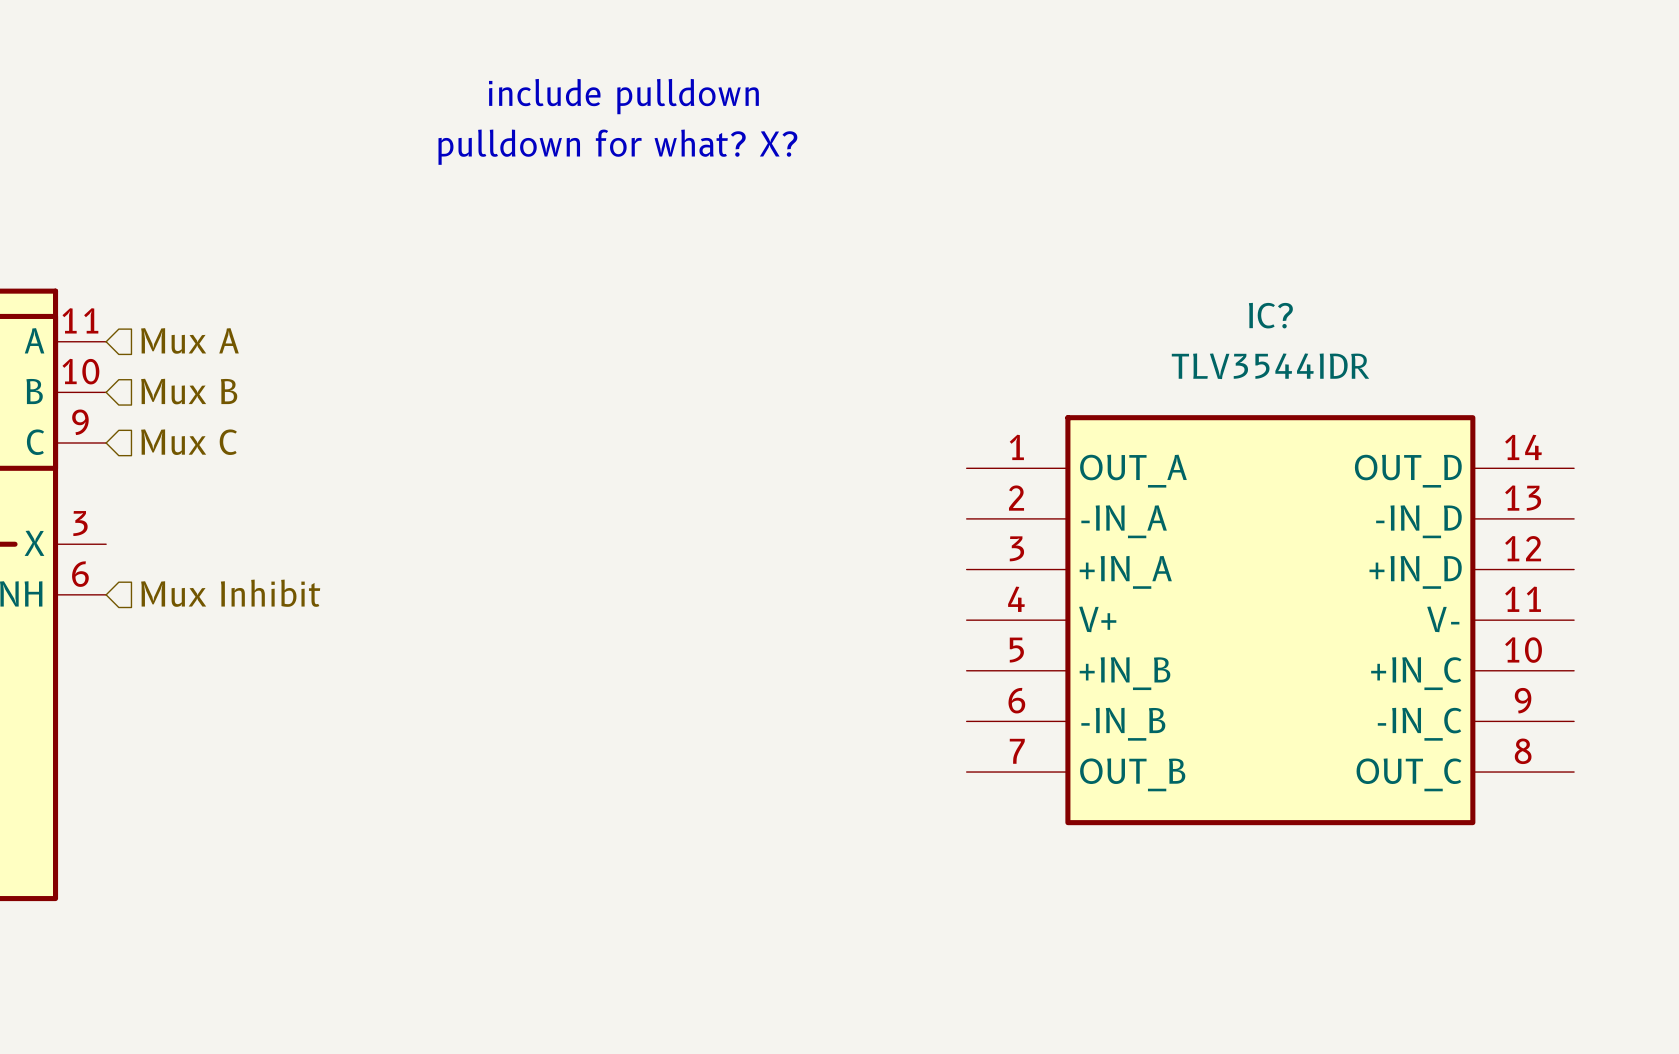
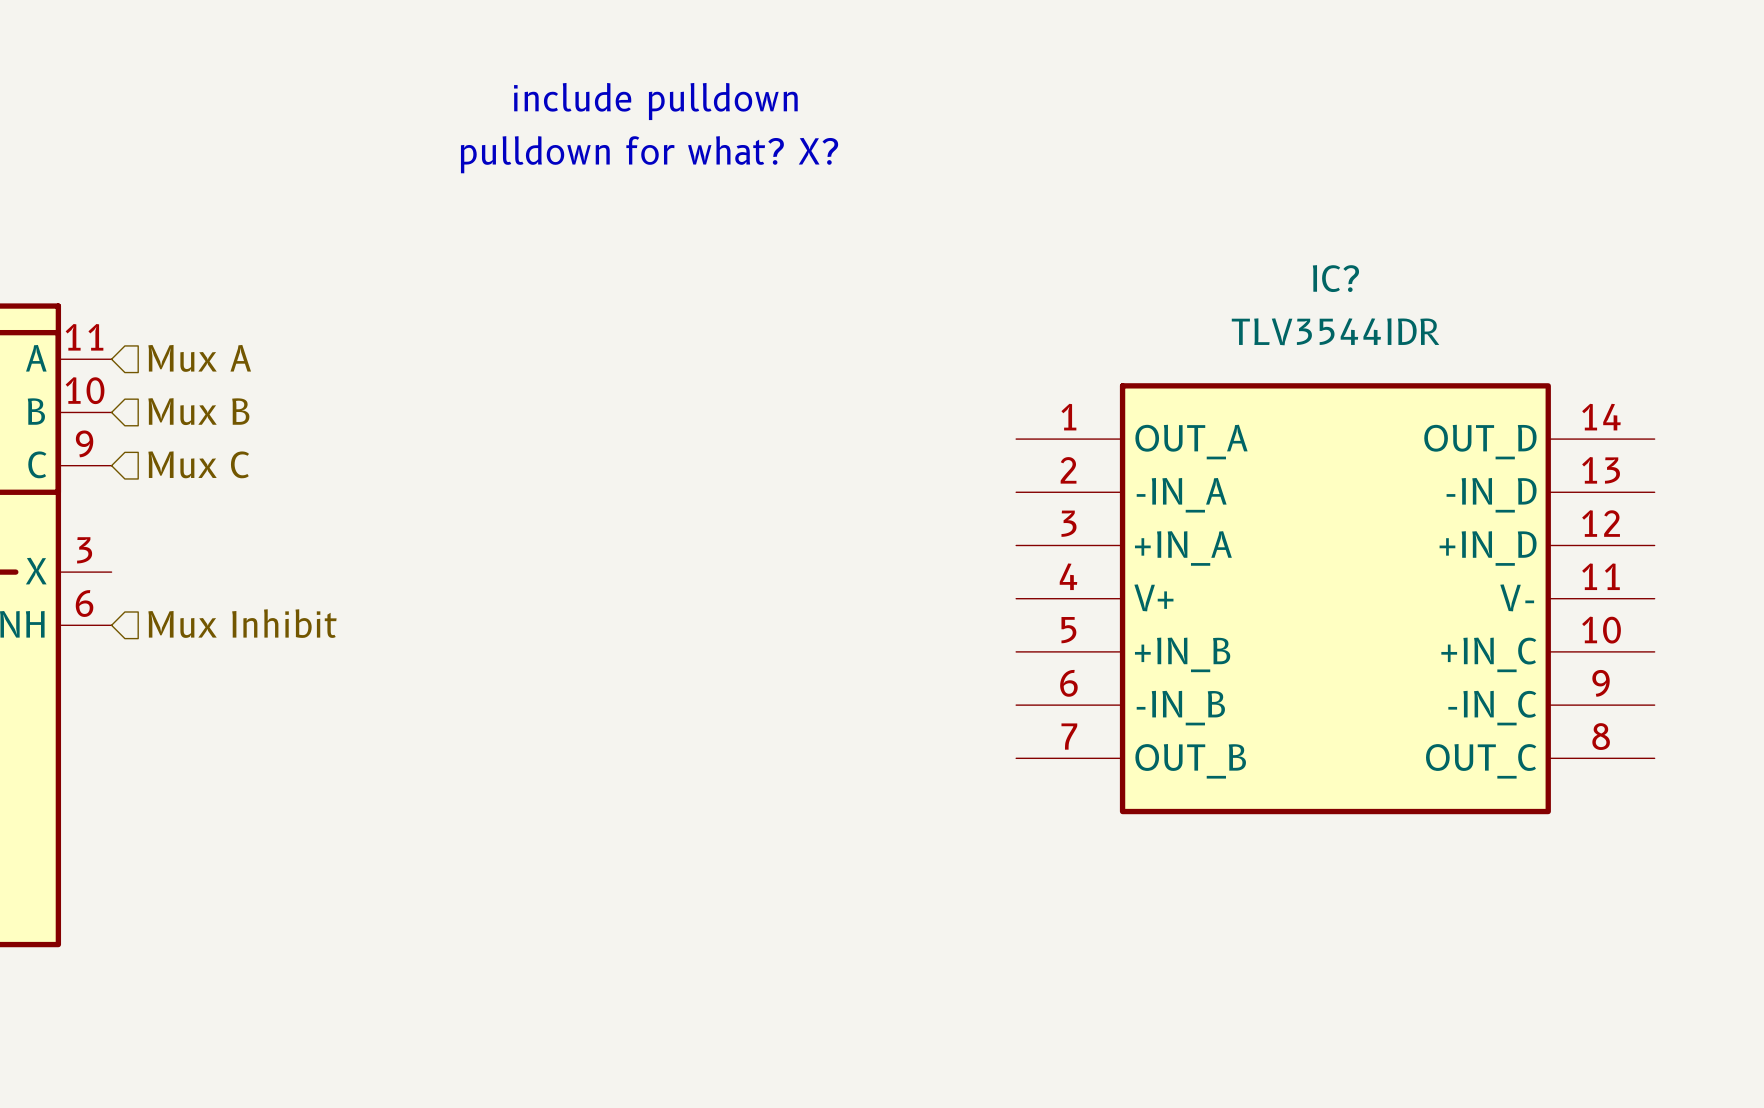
IC? position: (1270, 620) -> (1335, 598)

